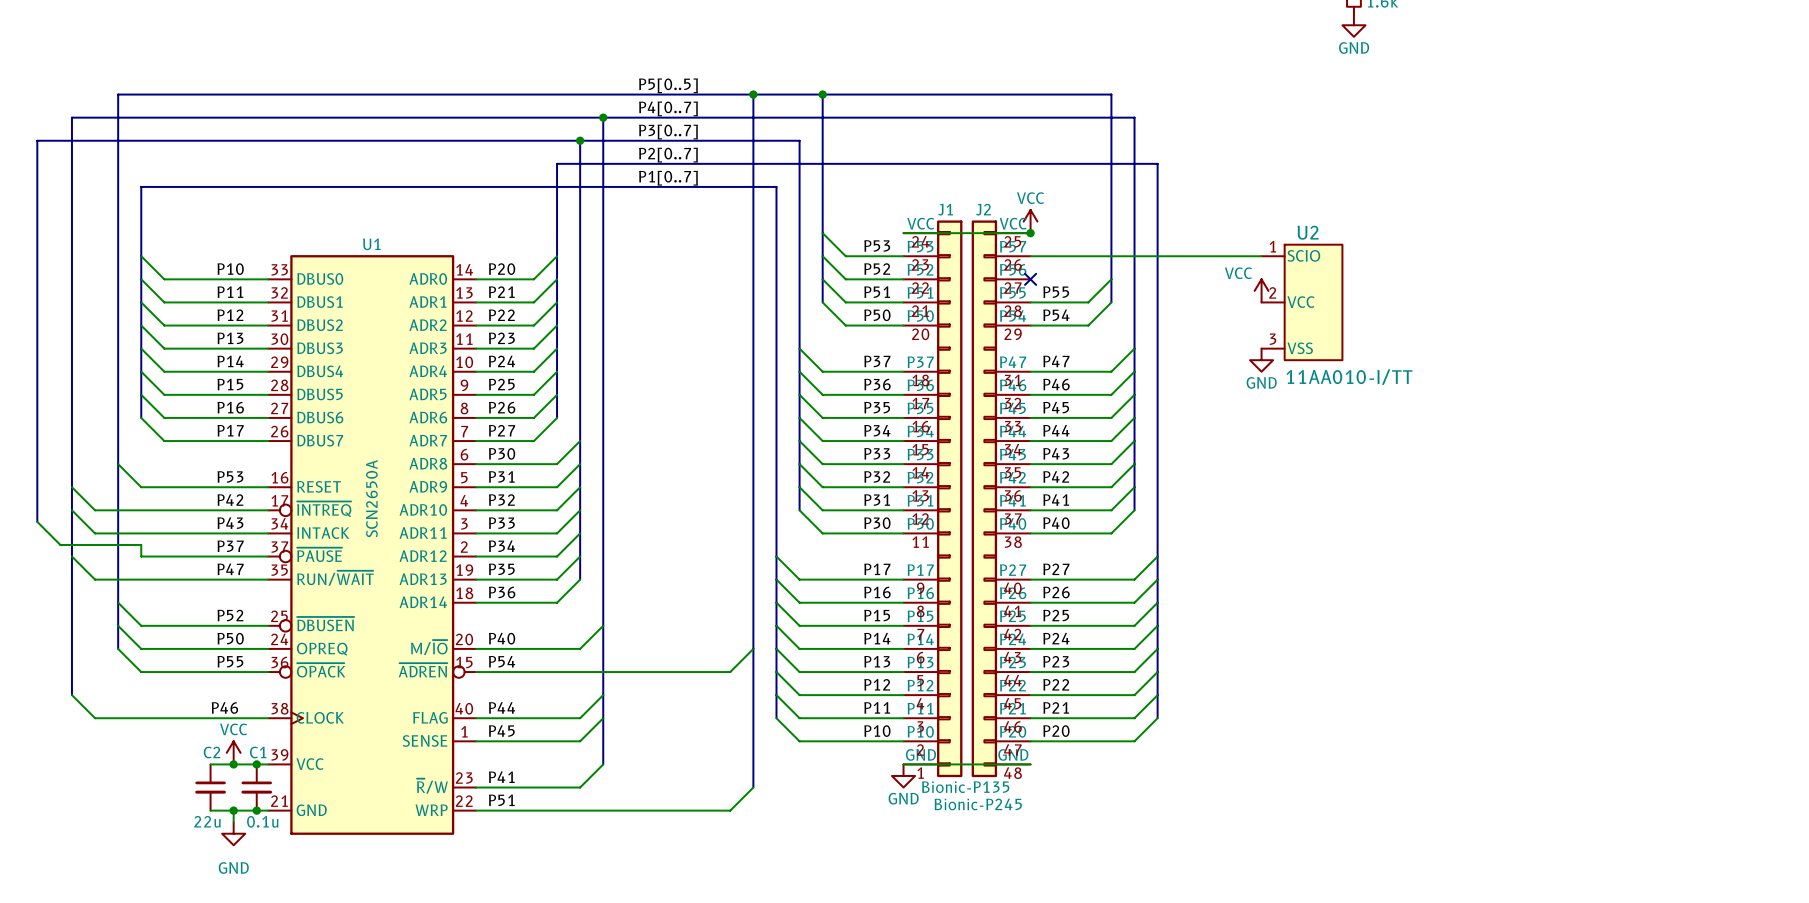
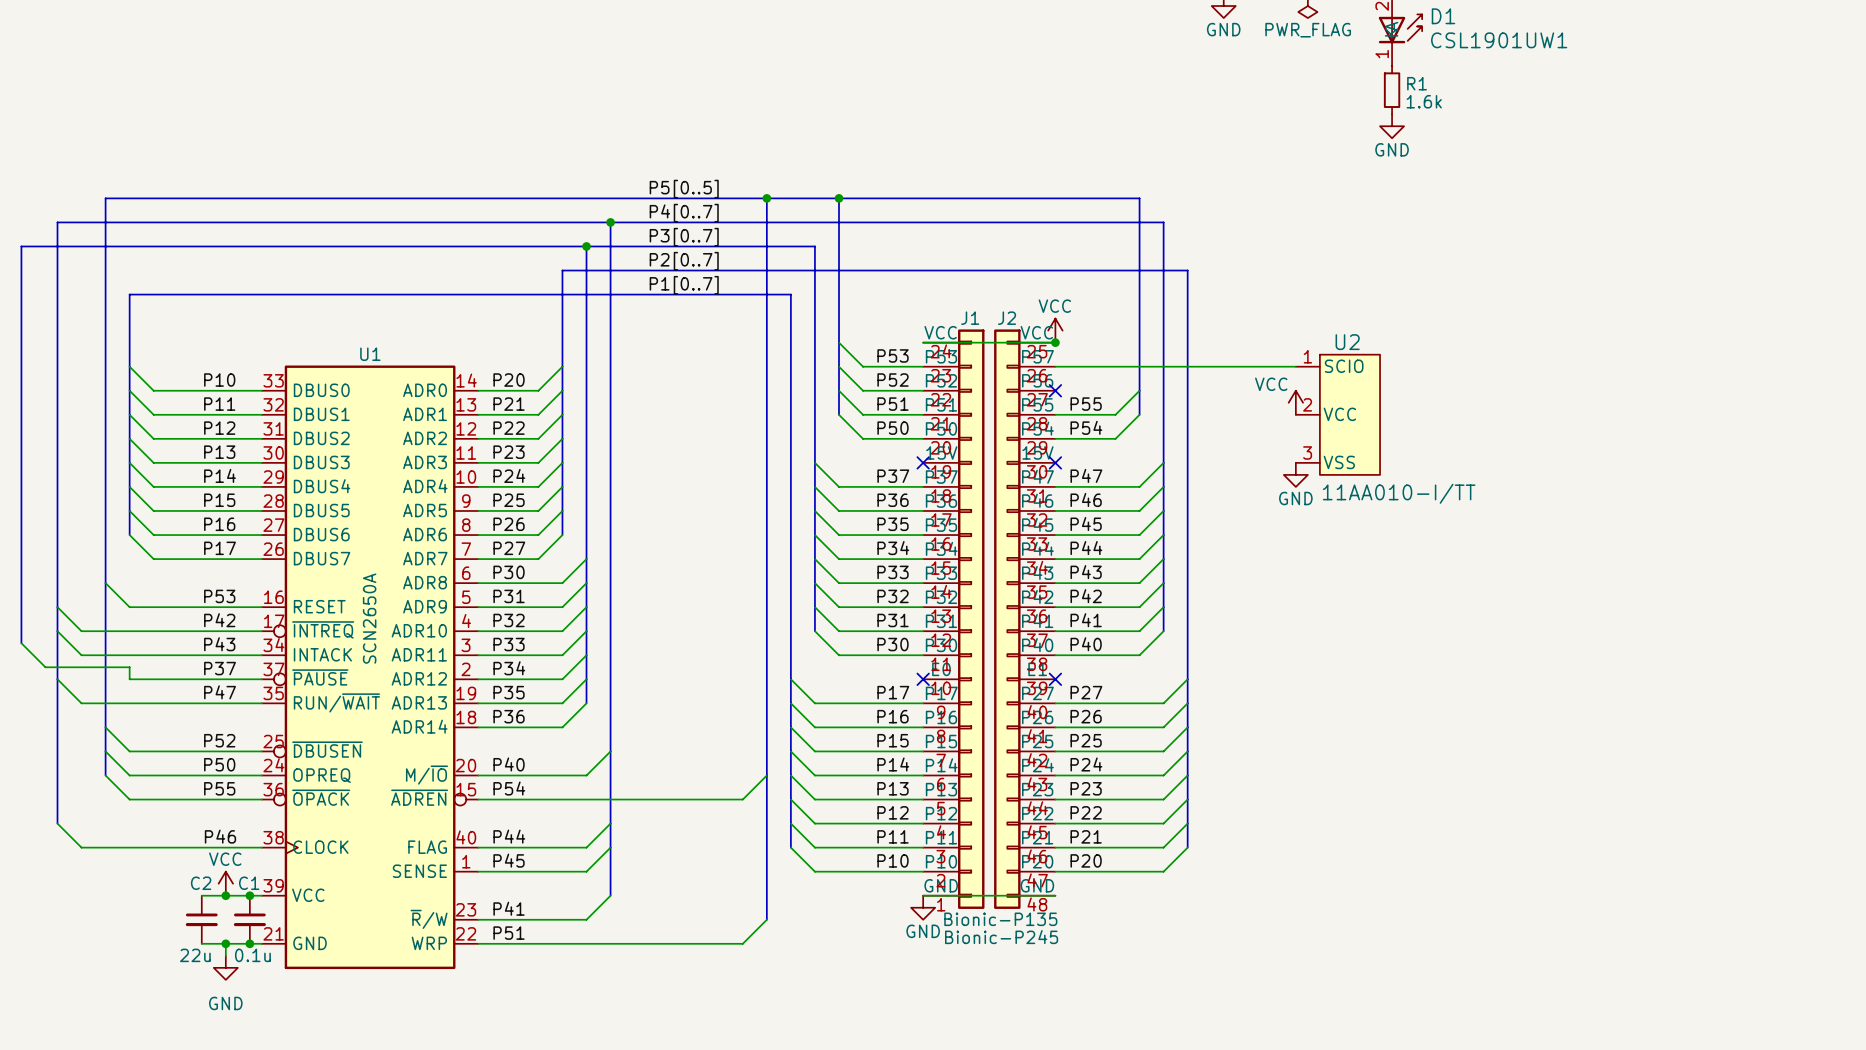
J1 symbol: [903, 220, 963, 778] -> [923, 329, 985, 909]
J2 symbol: [971, 220, 1031, 778] -> [994, 329, 1056, 909]
no-connect mark: none -> (923, 462)
no-connect mark: none -> (1055, 462)
no-connect mark: none -> (923, 679)
no-connect mark: none -> (1055, 679)

